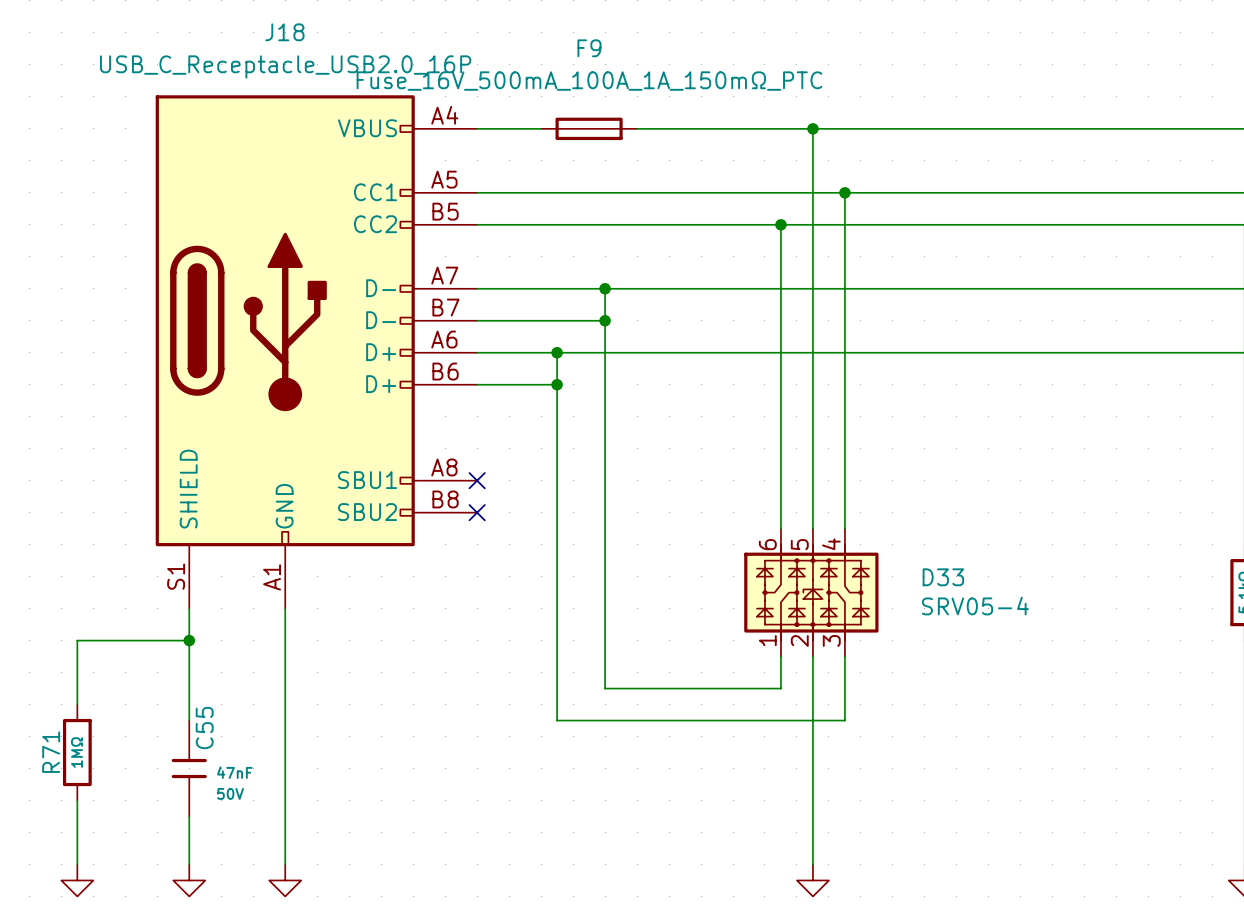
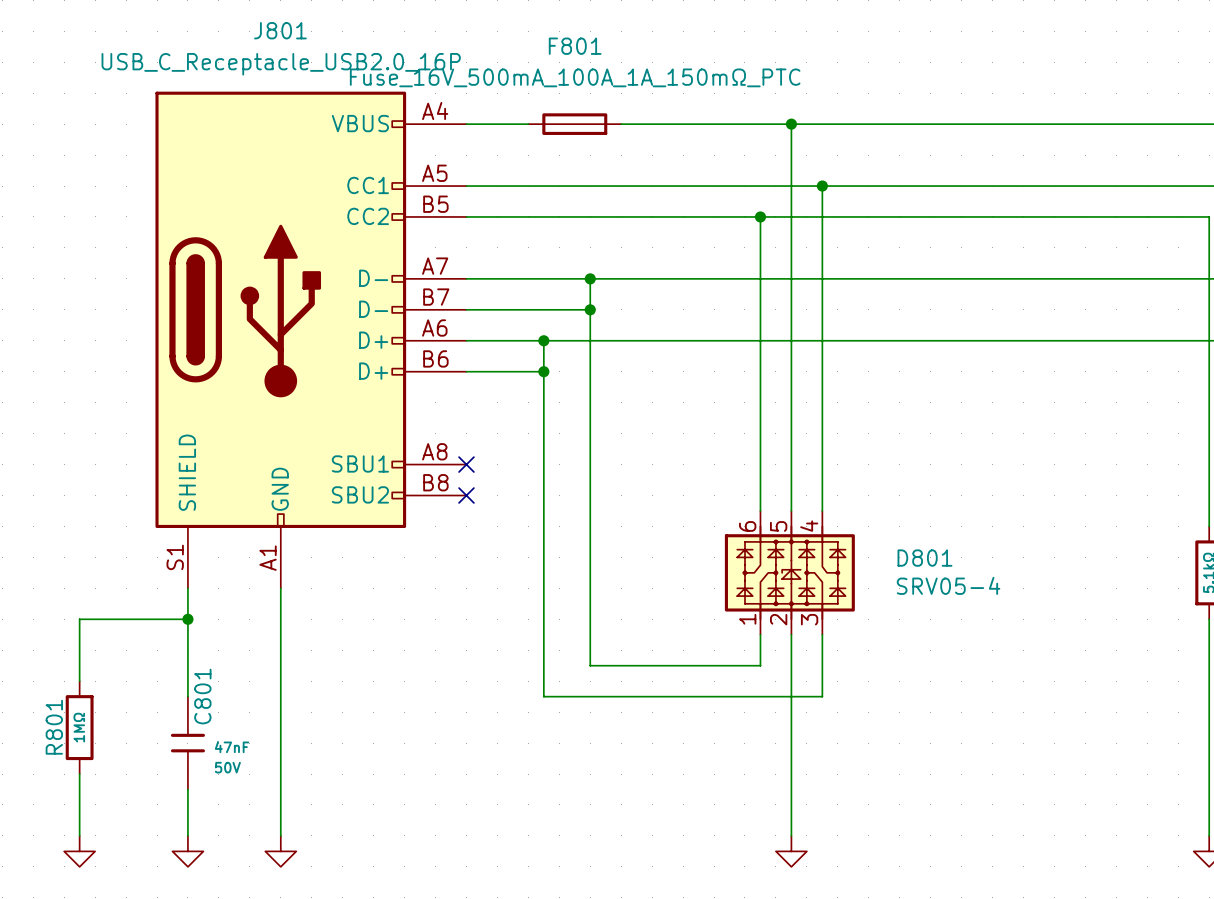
J18 name: J18 (284, 32) -> J801 (280, 30)
F9 name: F9 (589, 48) -> F801 (575, 46)
D33 name: D33 (943, 577) -> D801 (924, 558)
C55 name: C55 (204, 728) -> C801 (202, 696)
R71 name: R71 (51, 752) -> R801 (54, 727)

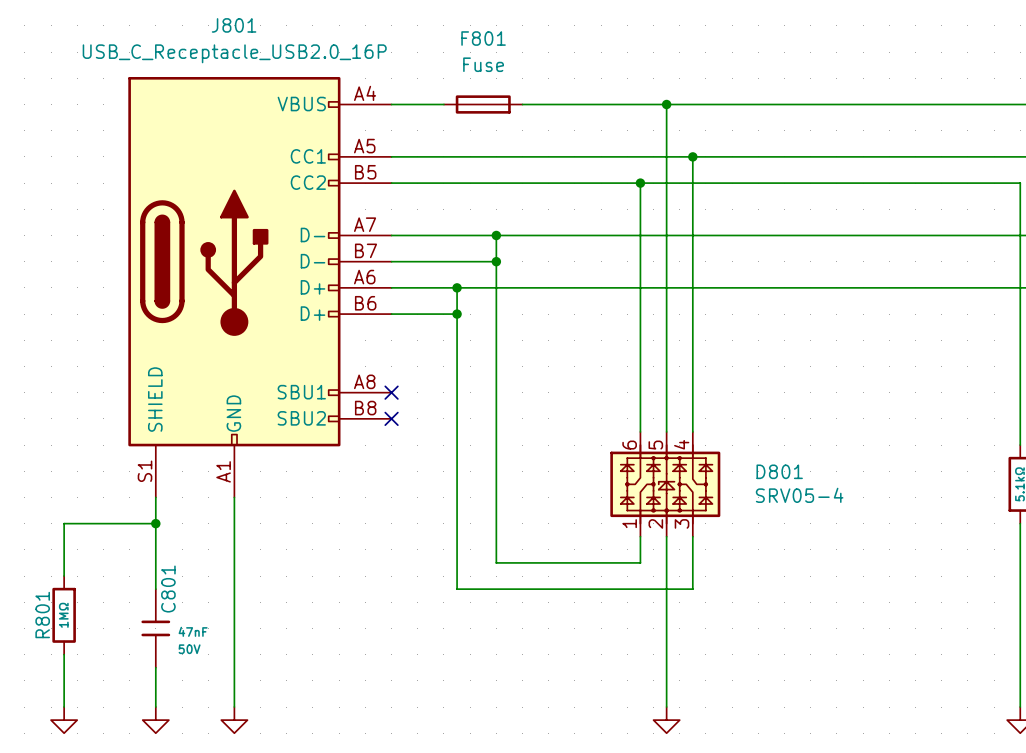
F801 value: Fuse_16V_500mA_100A_1A_150mΩ_PTC (575, 77) -> Fuse (483, 64)

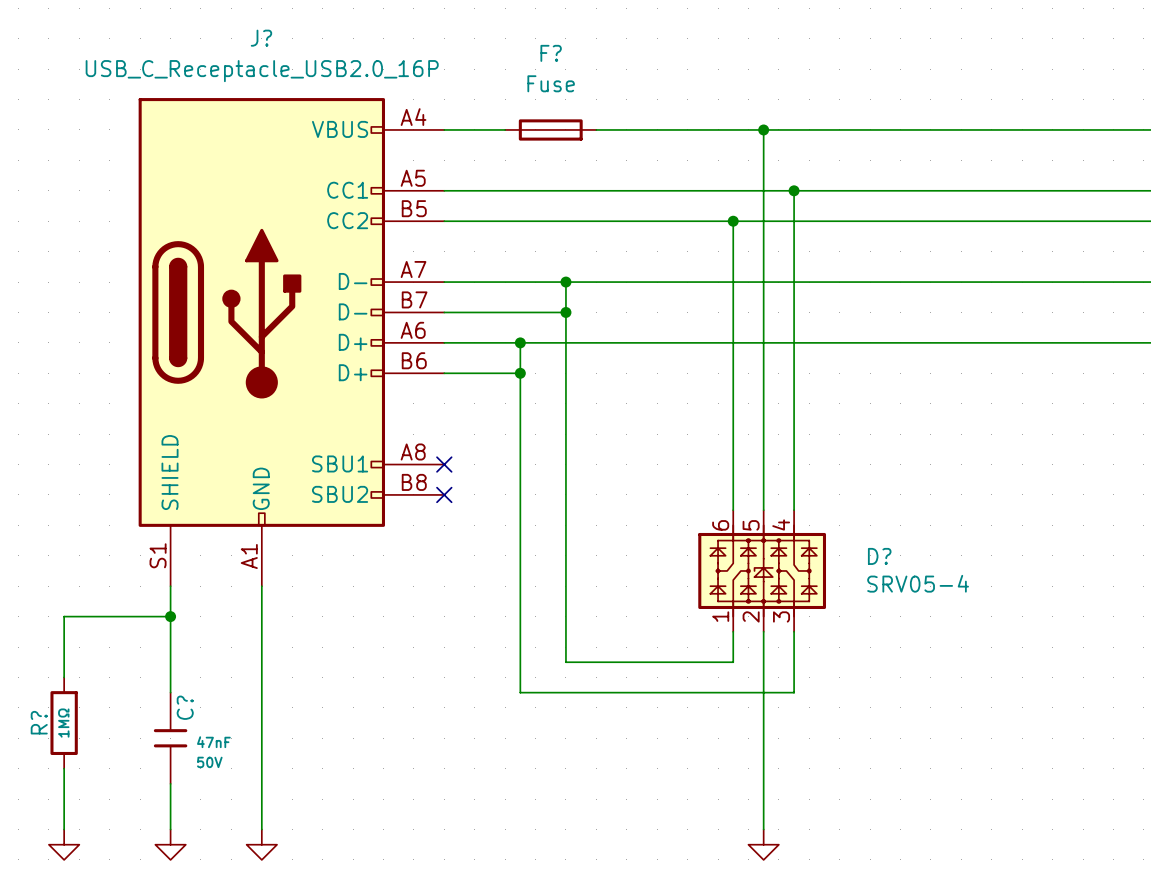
J801 name: J801 (234, 25) -> J? (261, 38)
F801 name: F801 (483, 38) -> F? (551, 53)
D801 name: D801 (779, 471) -> D? (879, 556)
C801 name: C801 (168, 589) -> C? (185, 707)
R801 name: R801 (42, 615) -> R? (39, 722)

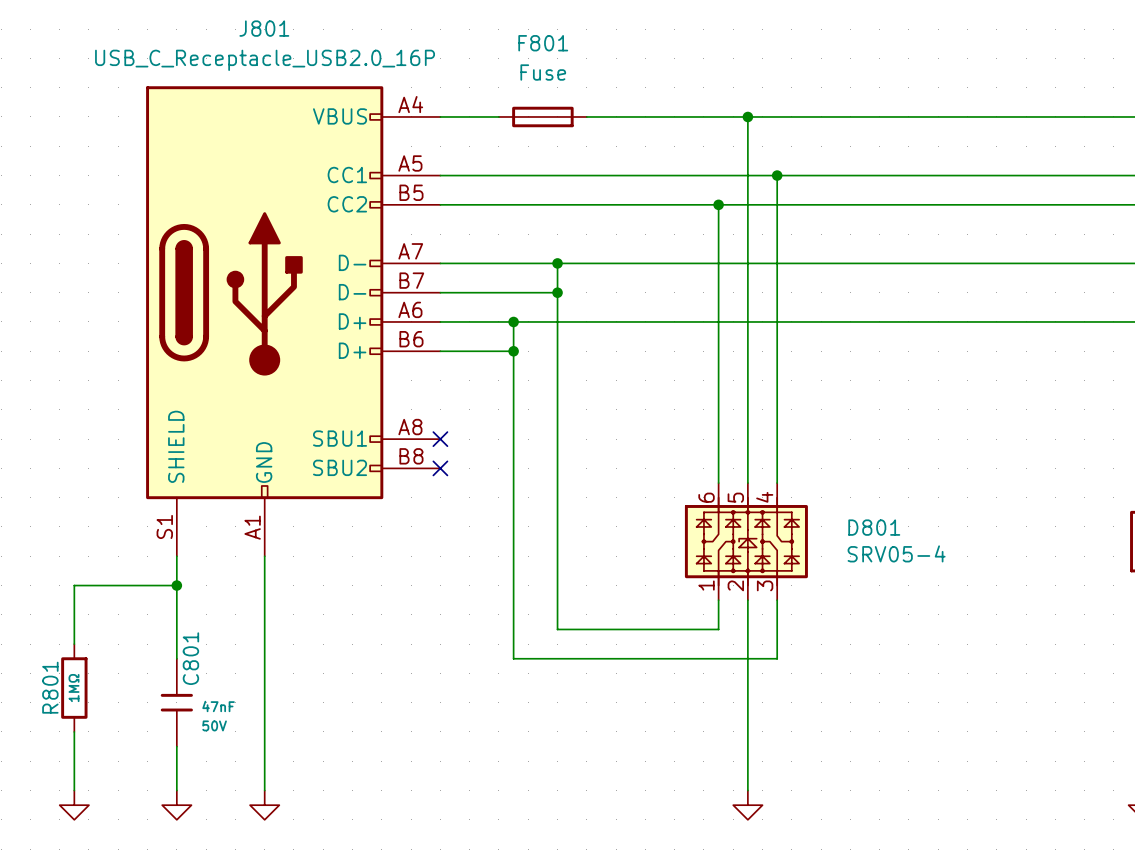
J? name: J? (261, 38) -> J801 (264, 28)
F? name: F? (551, 53) -> F801 (543, 43)
D? name: D? (879, 556) -> D801 (874, 527)
C? name: C? (185, 707) -> C801 (190, 658)
R? name: R? (39, 722) -> R801 (50, 687)

